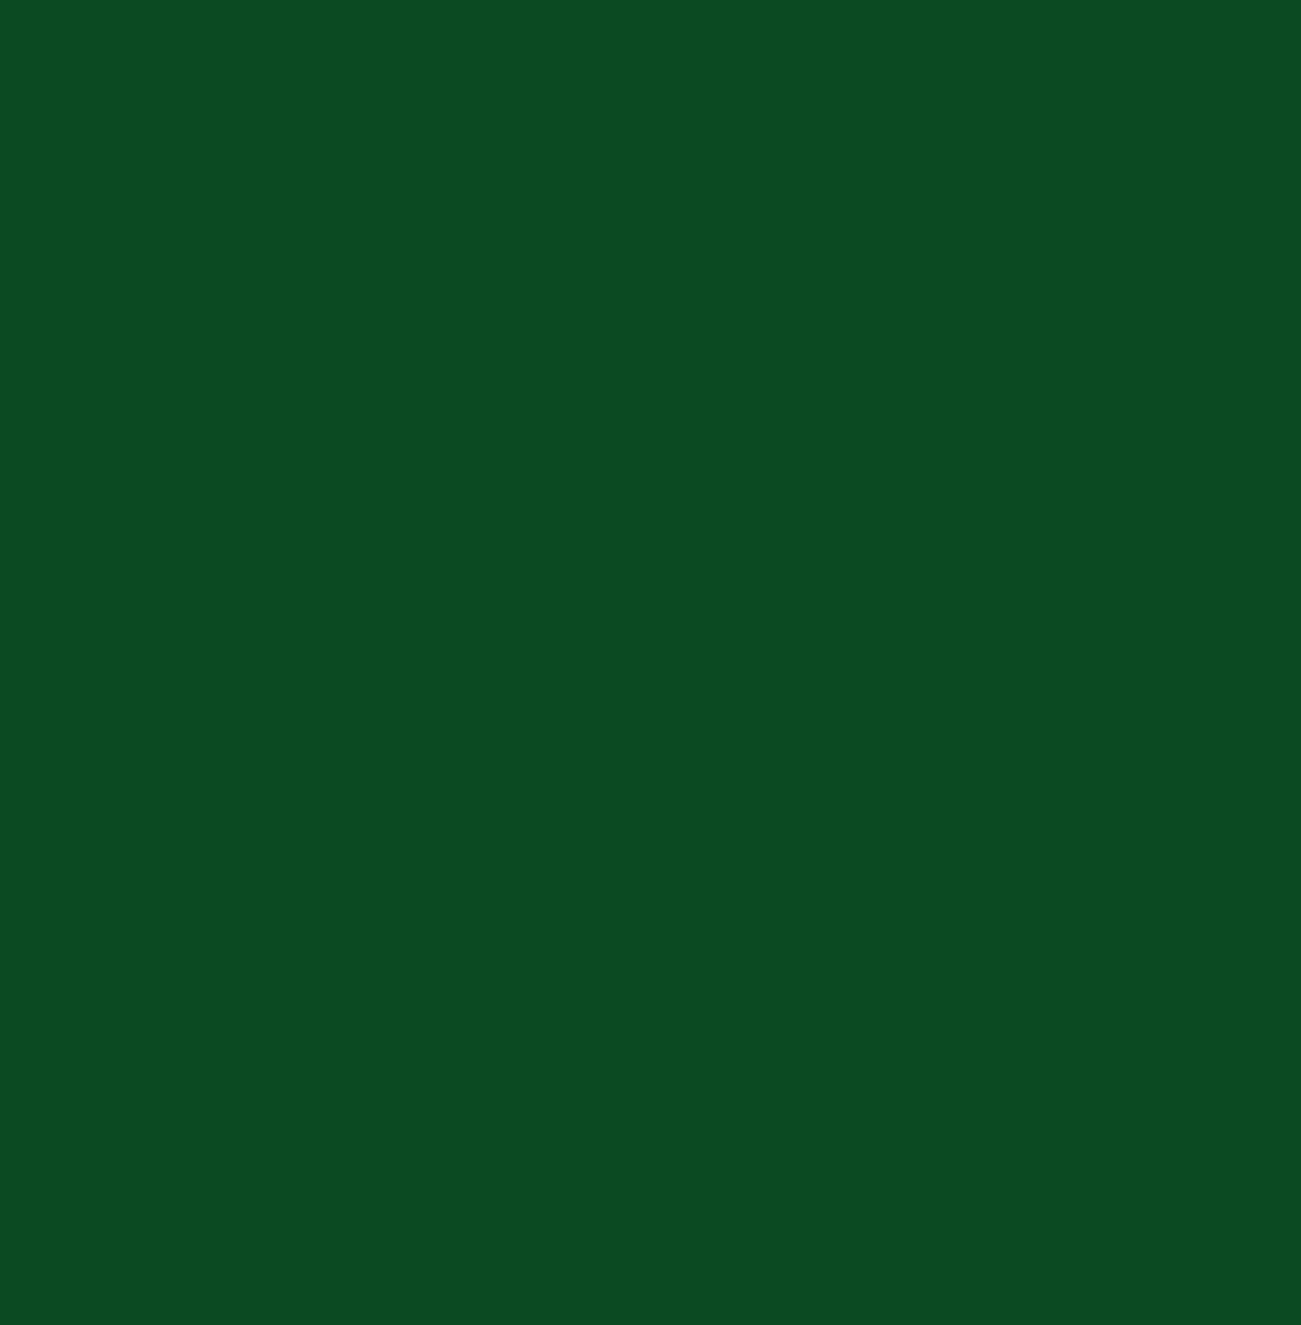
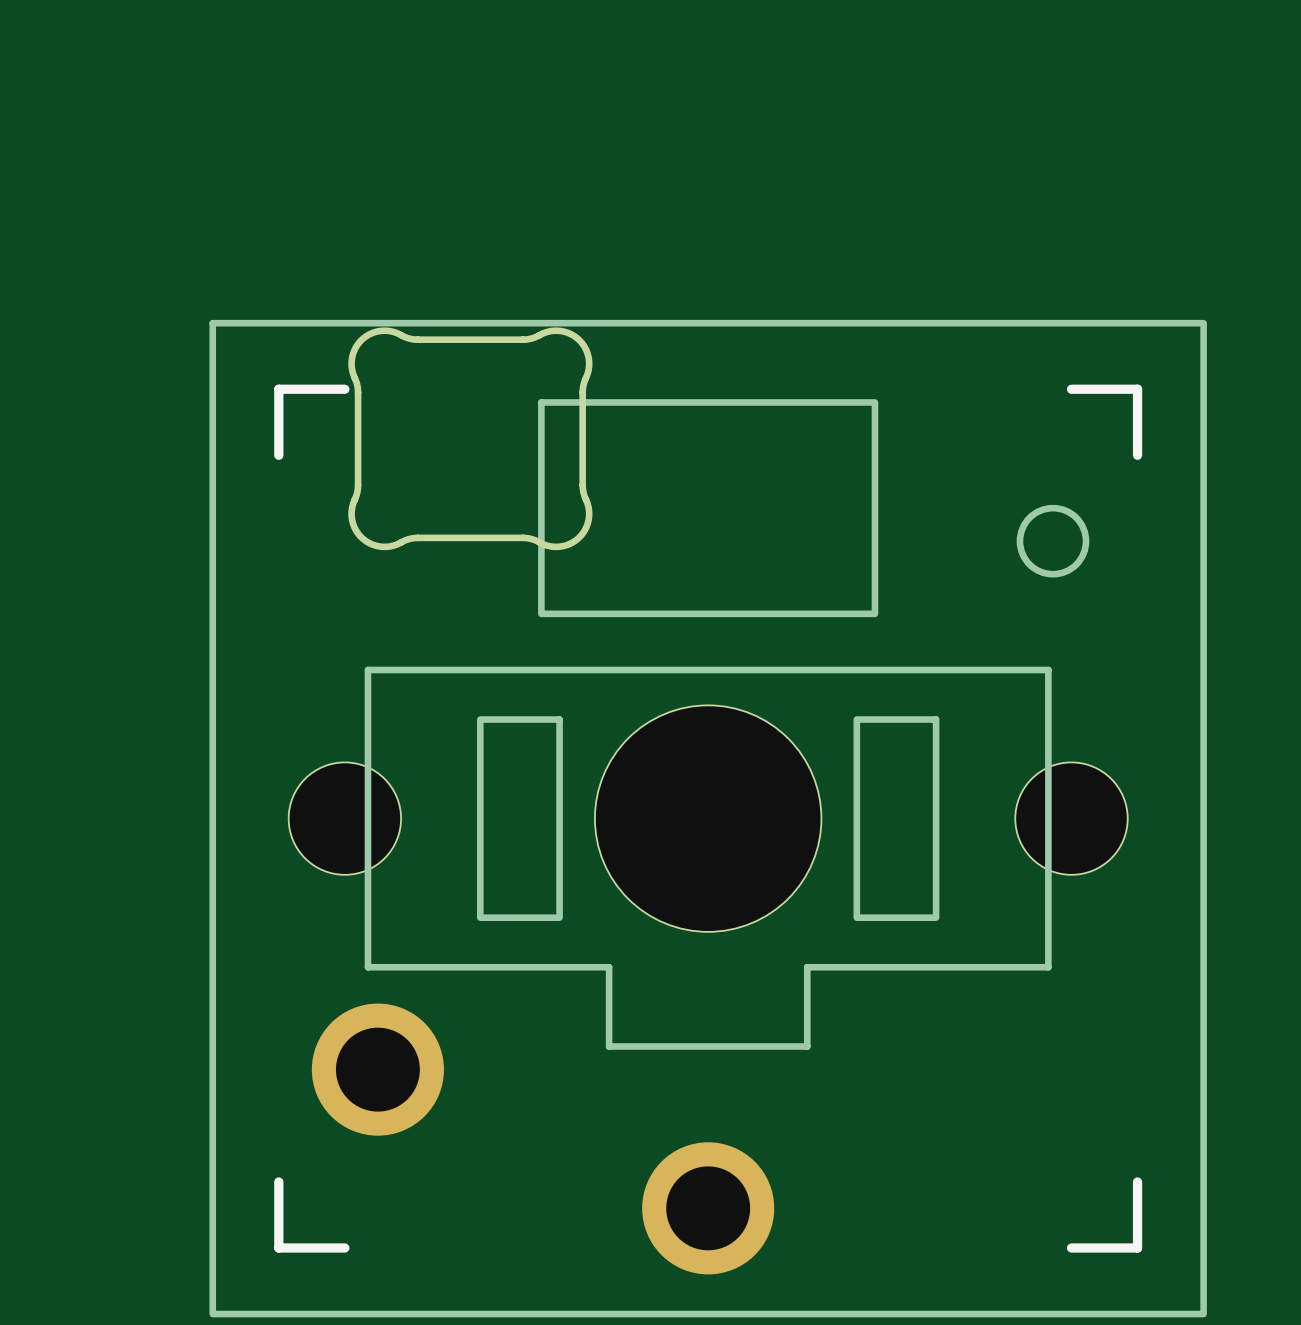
part: none -> (470, 438)
part: none -> (708, 818)

